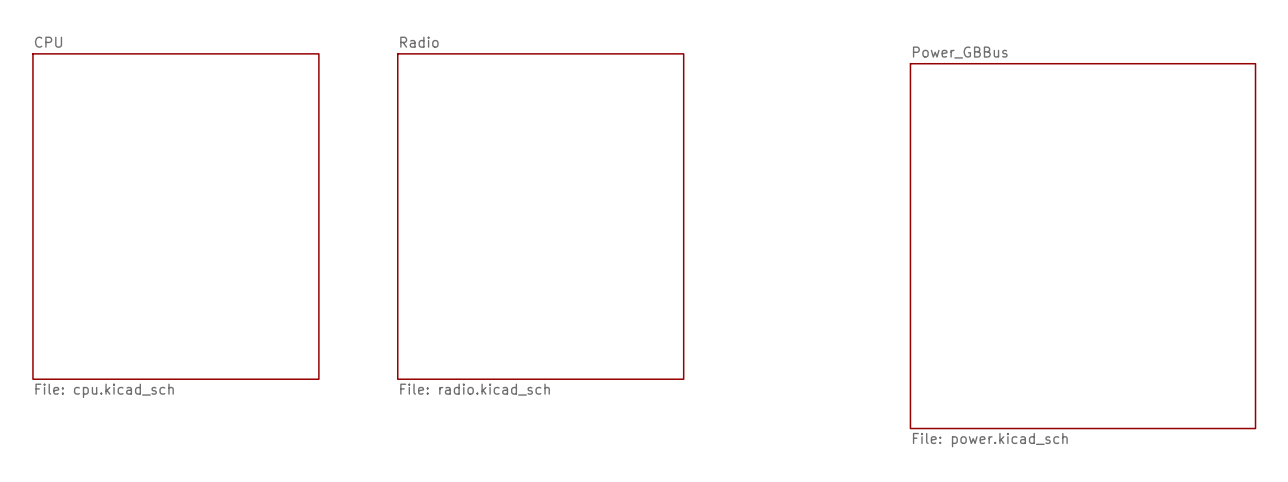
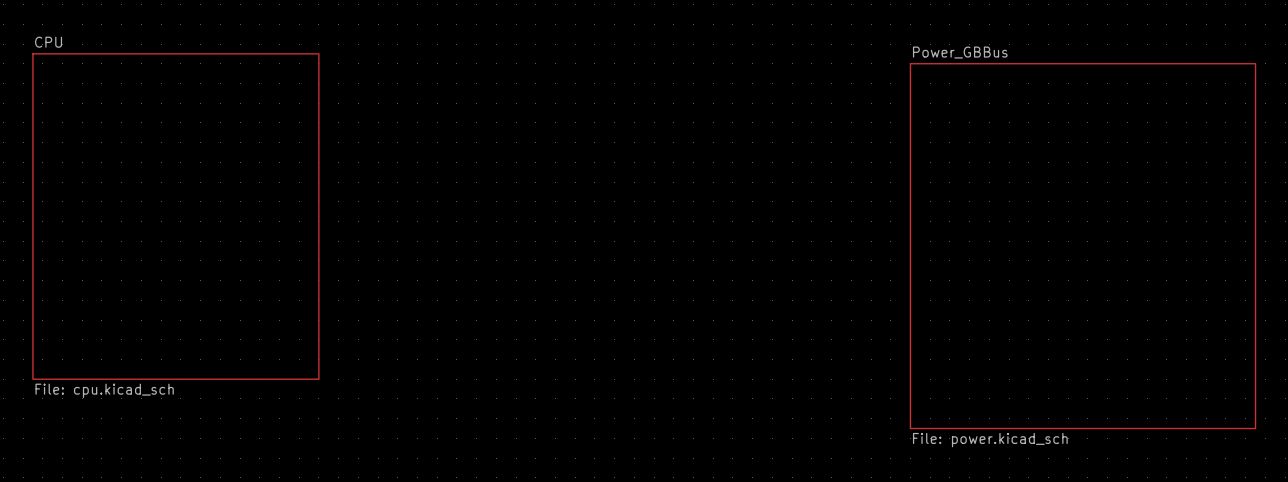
sheet Radio: File: radio.kicad_sch (540, 216) -> none

